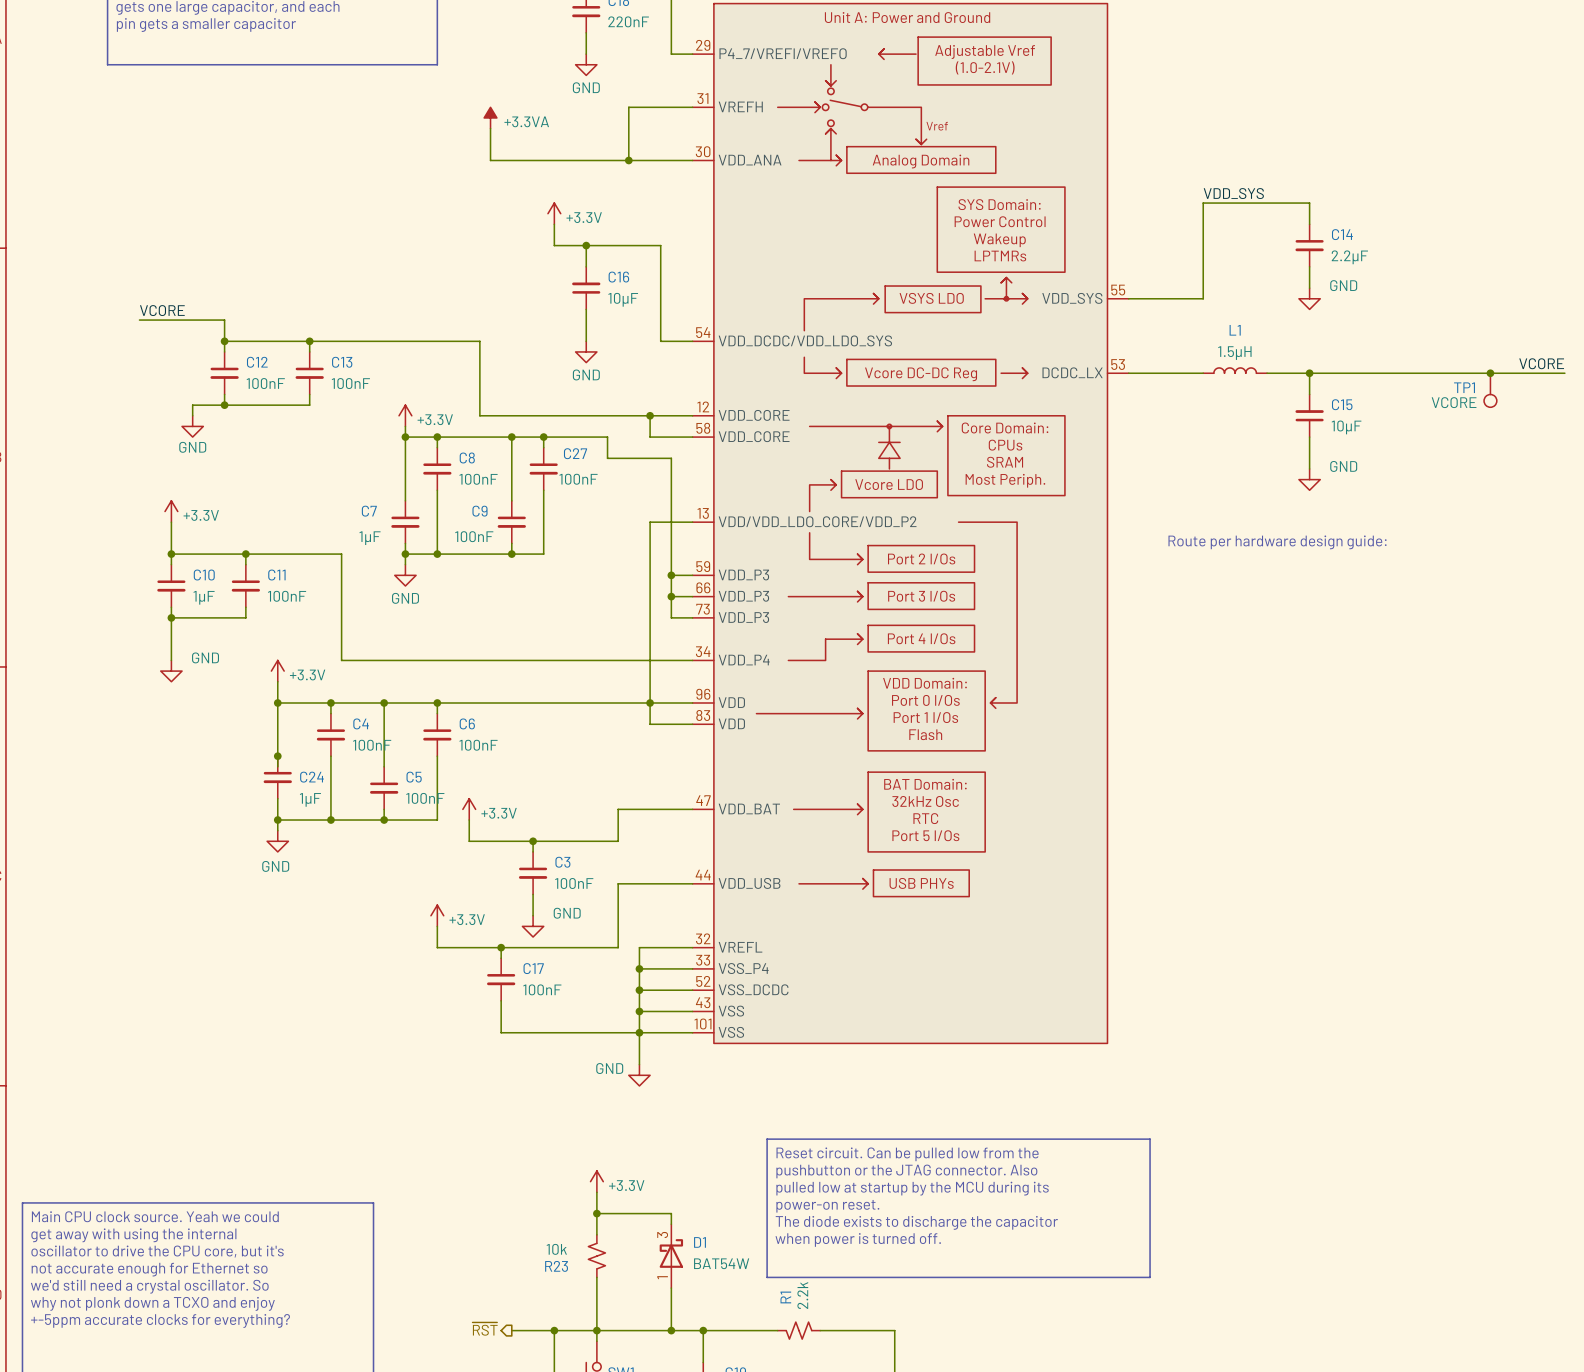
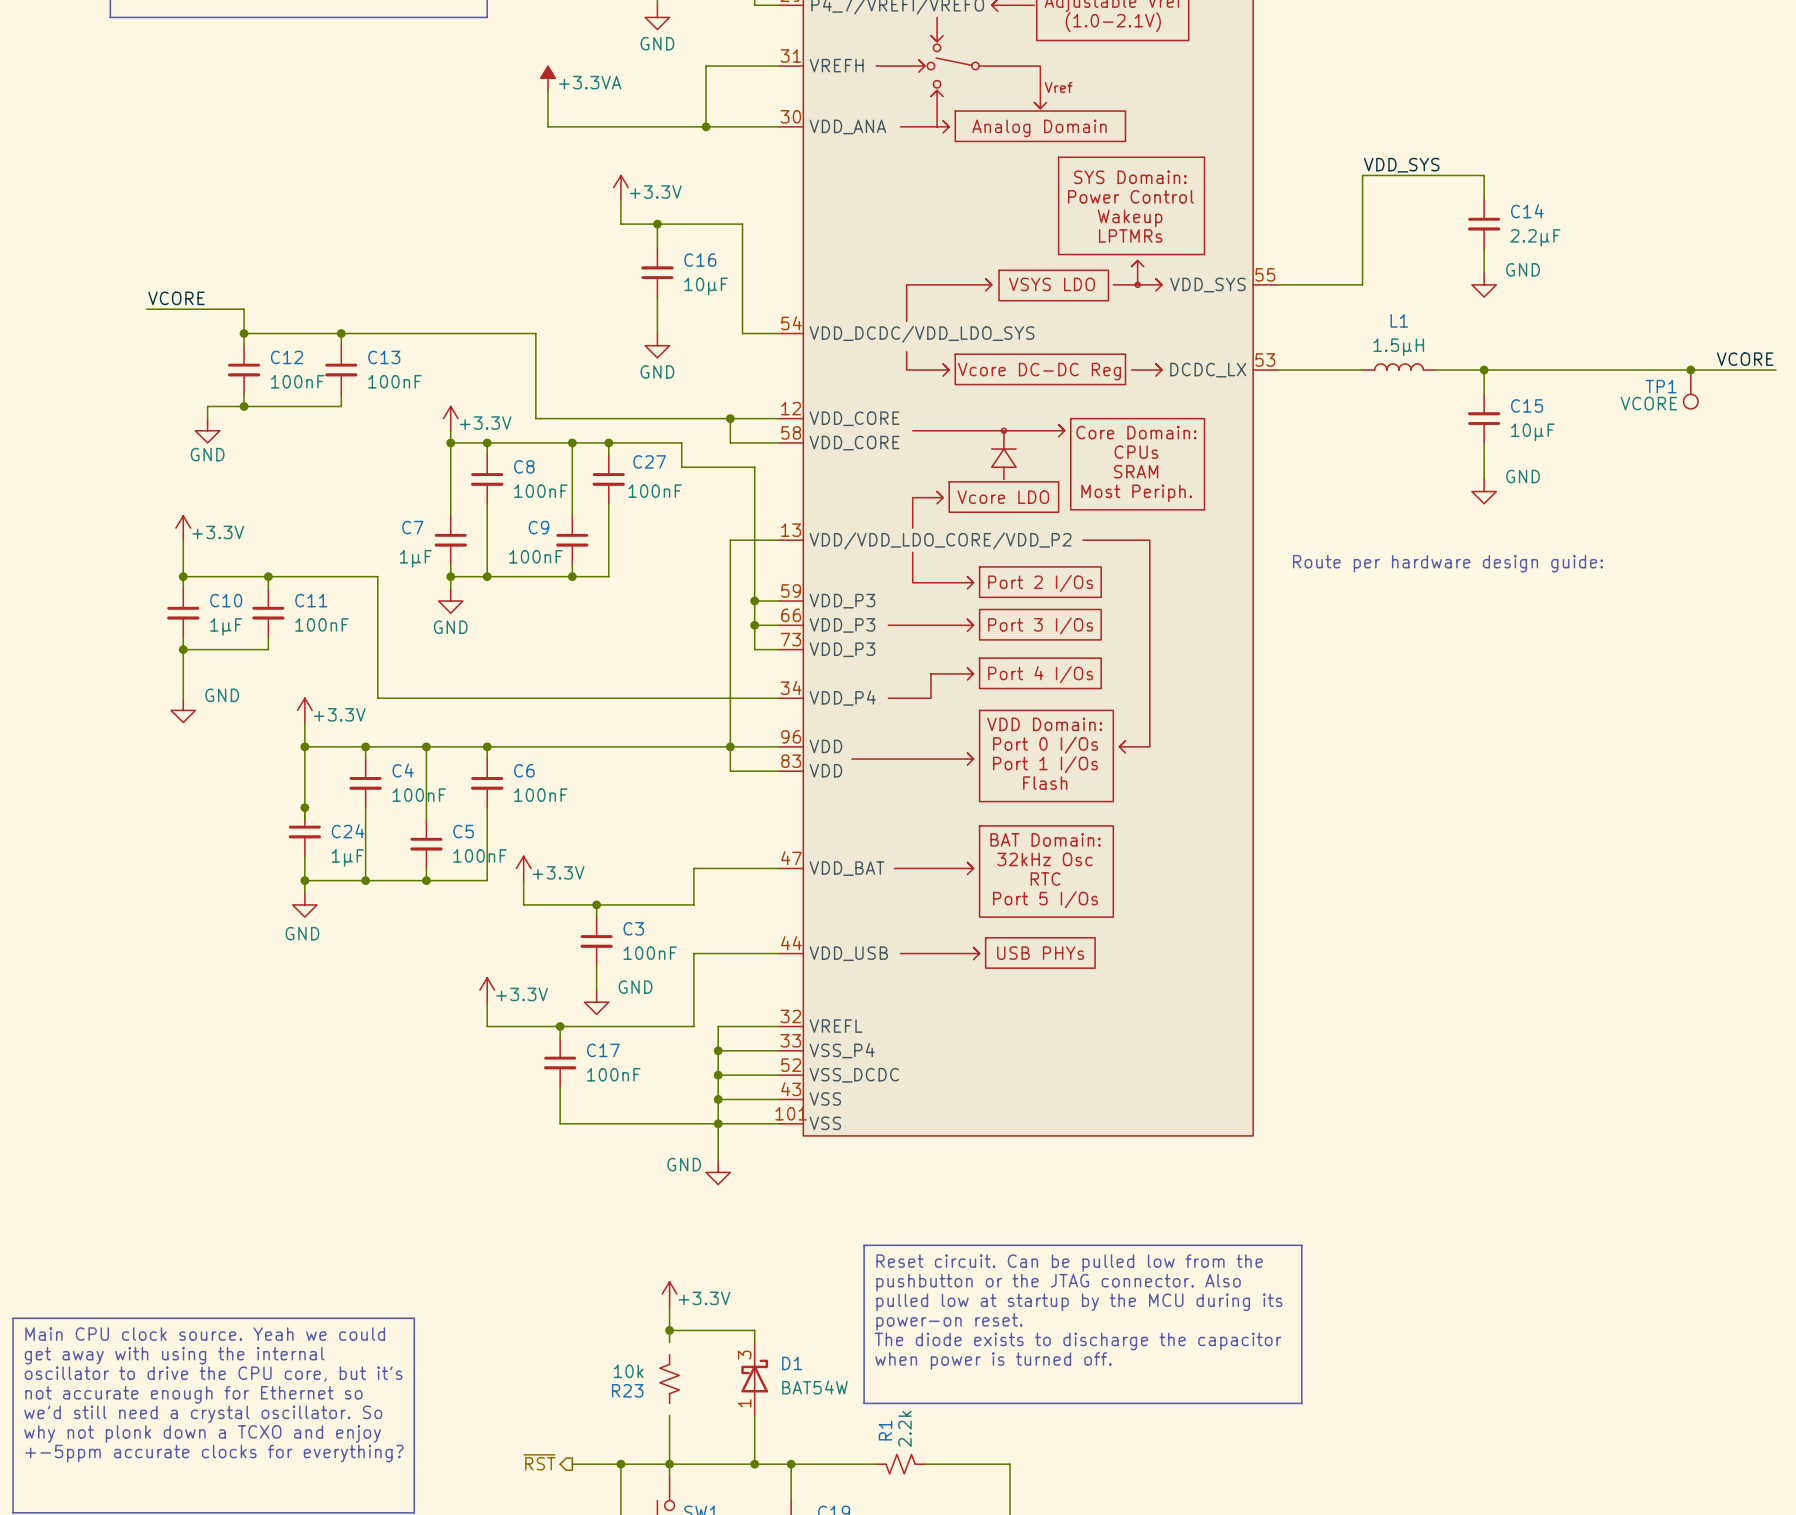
wire: (596, 1224) (596, 1234) -> none
wire: (596, 1277) (596, 1288) -> none

